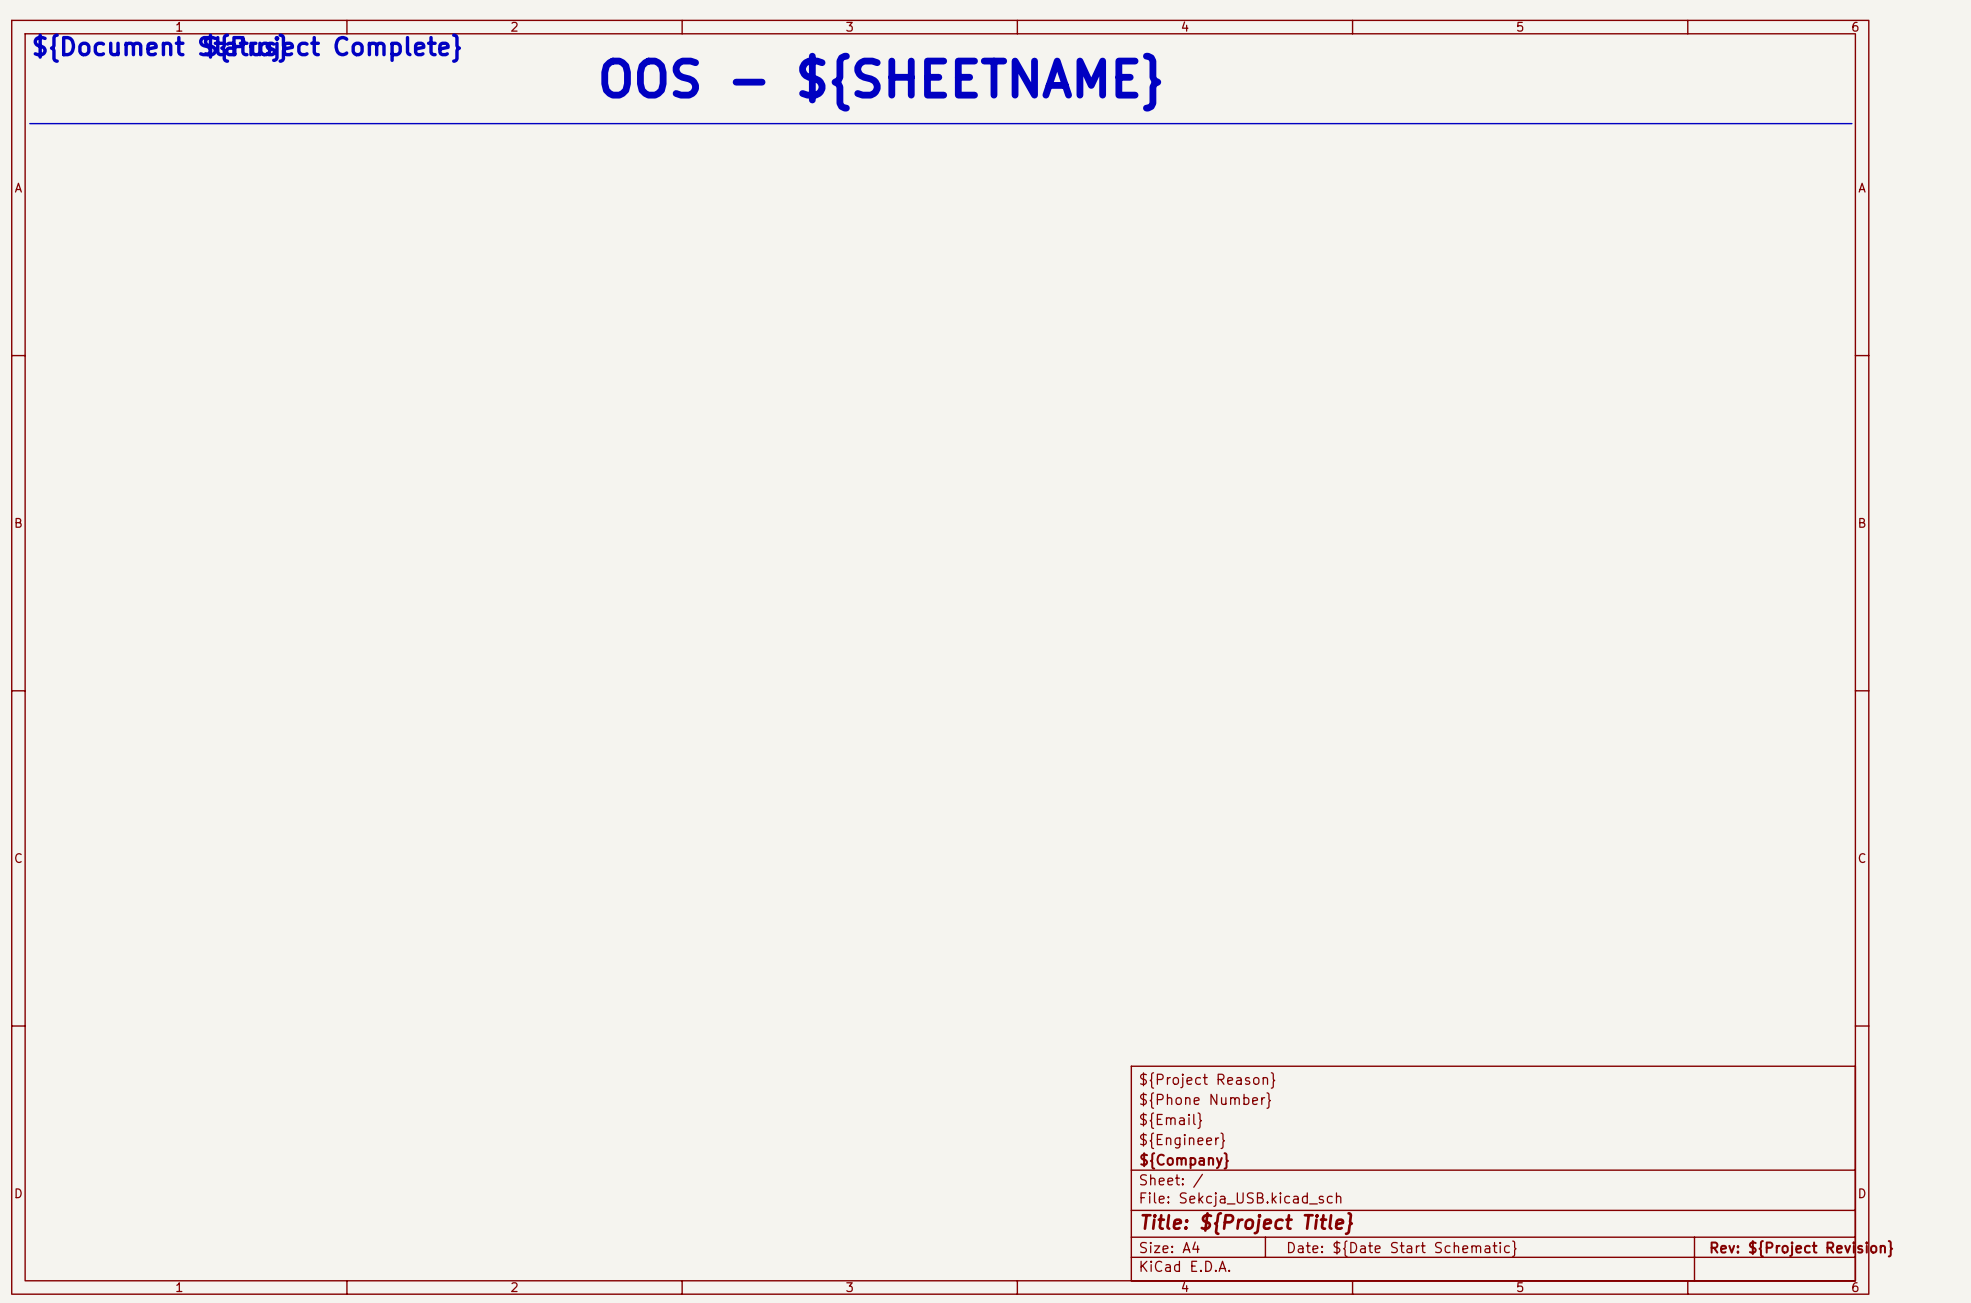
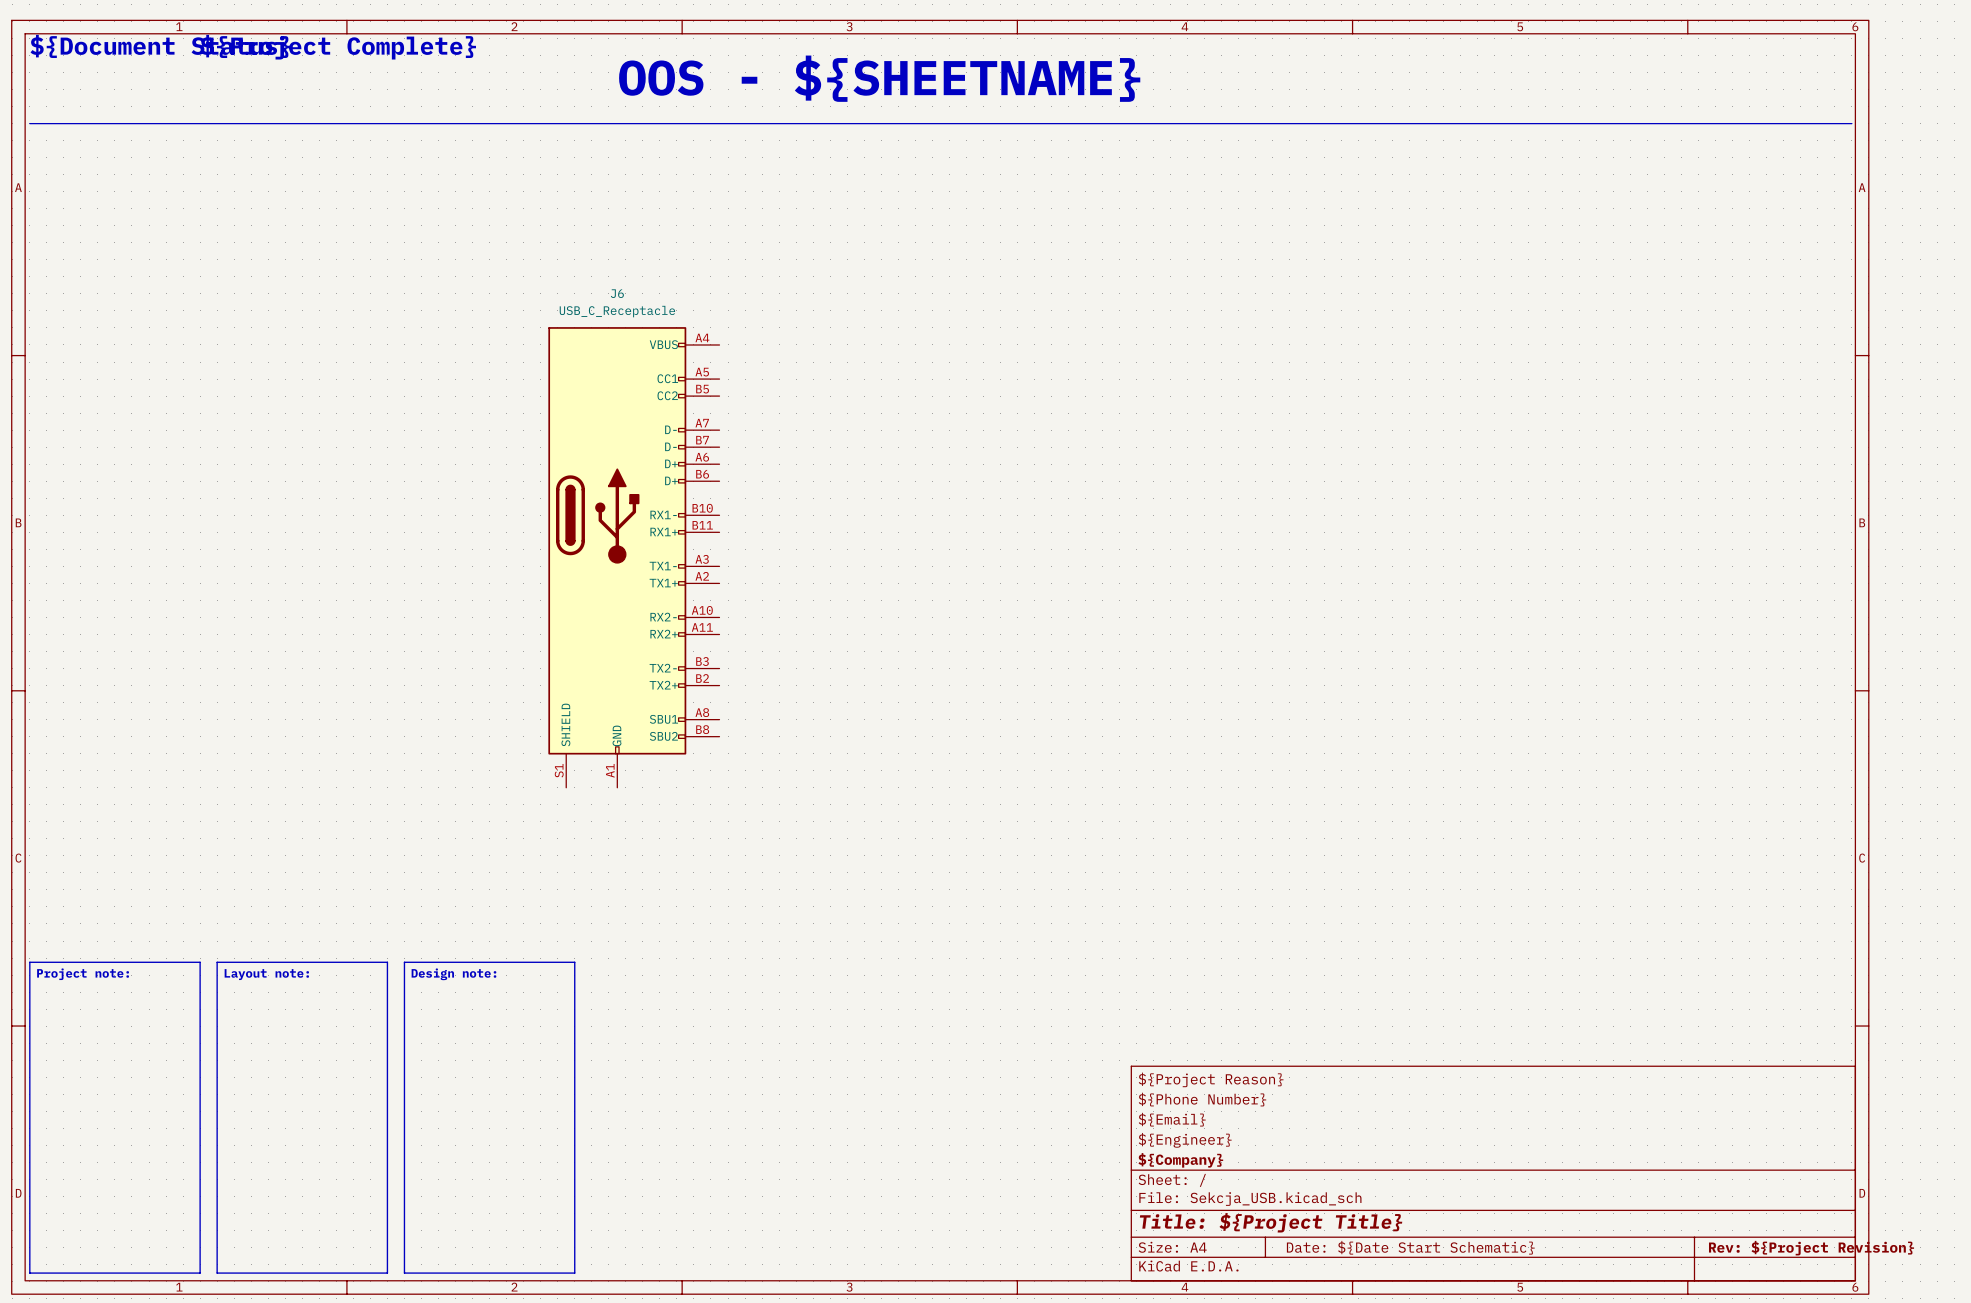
J6: none -> USB_C_Receptacle (633, 557)
line: none -> (29, 962) (200, 962) (200, 1273) (29, 1273) (29, 962)
line: none -> (217, 962) (387, 962) (387, 1273) (217, 1273) (217, 962)
line: none -> (404, 962) (574, 962) (574, 1273) (404, 1273) (404, 962)
text: none -> Project note: (83, 974)
text: none -> Layout note: (266, 974)
text: none -> Design note: (453, 974)

